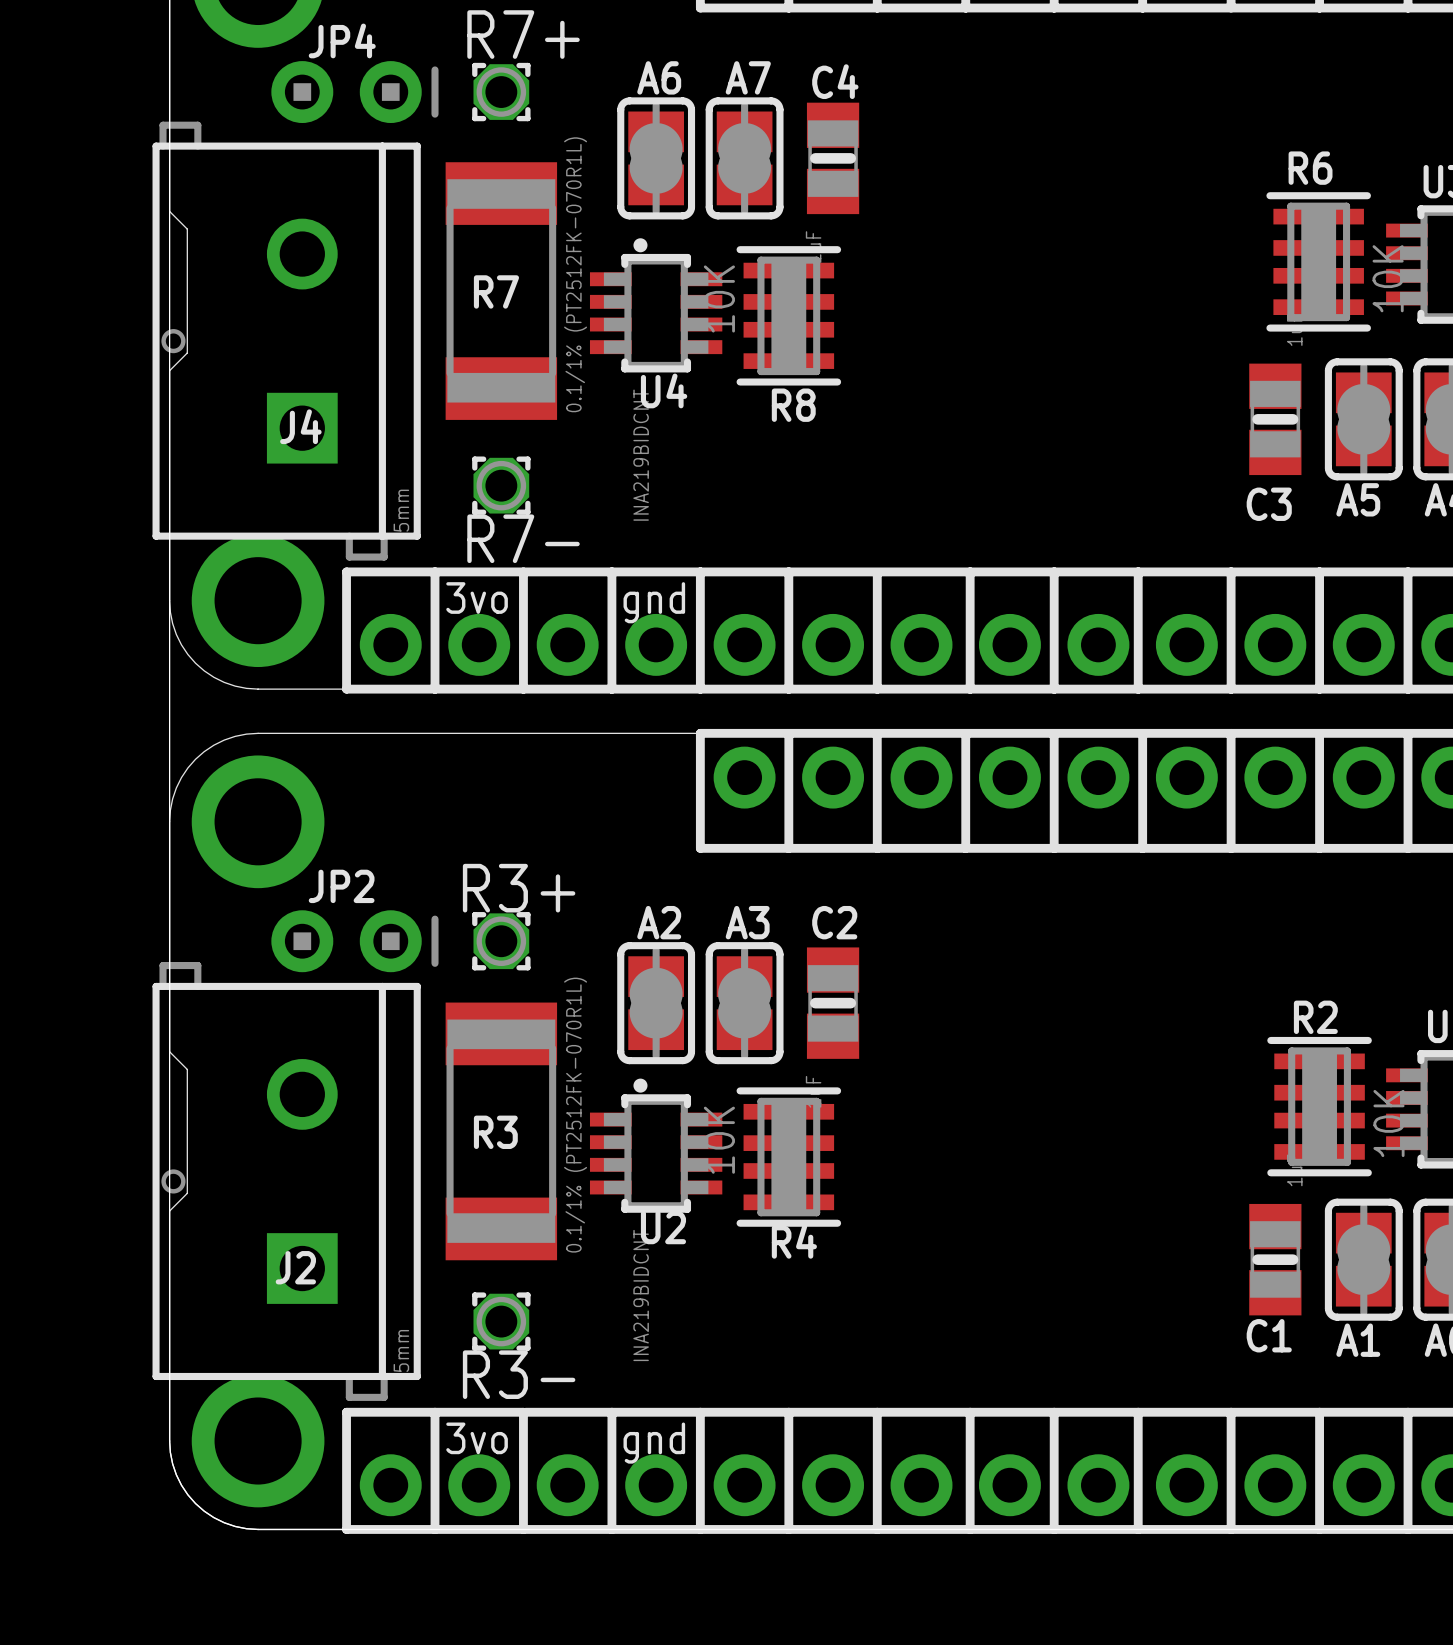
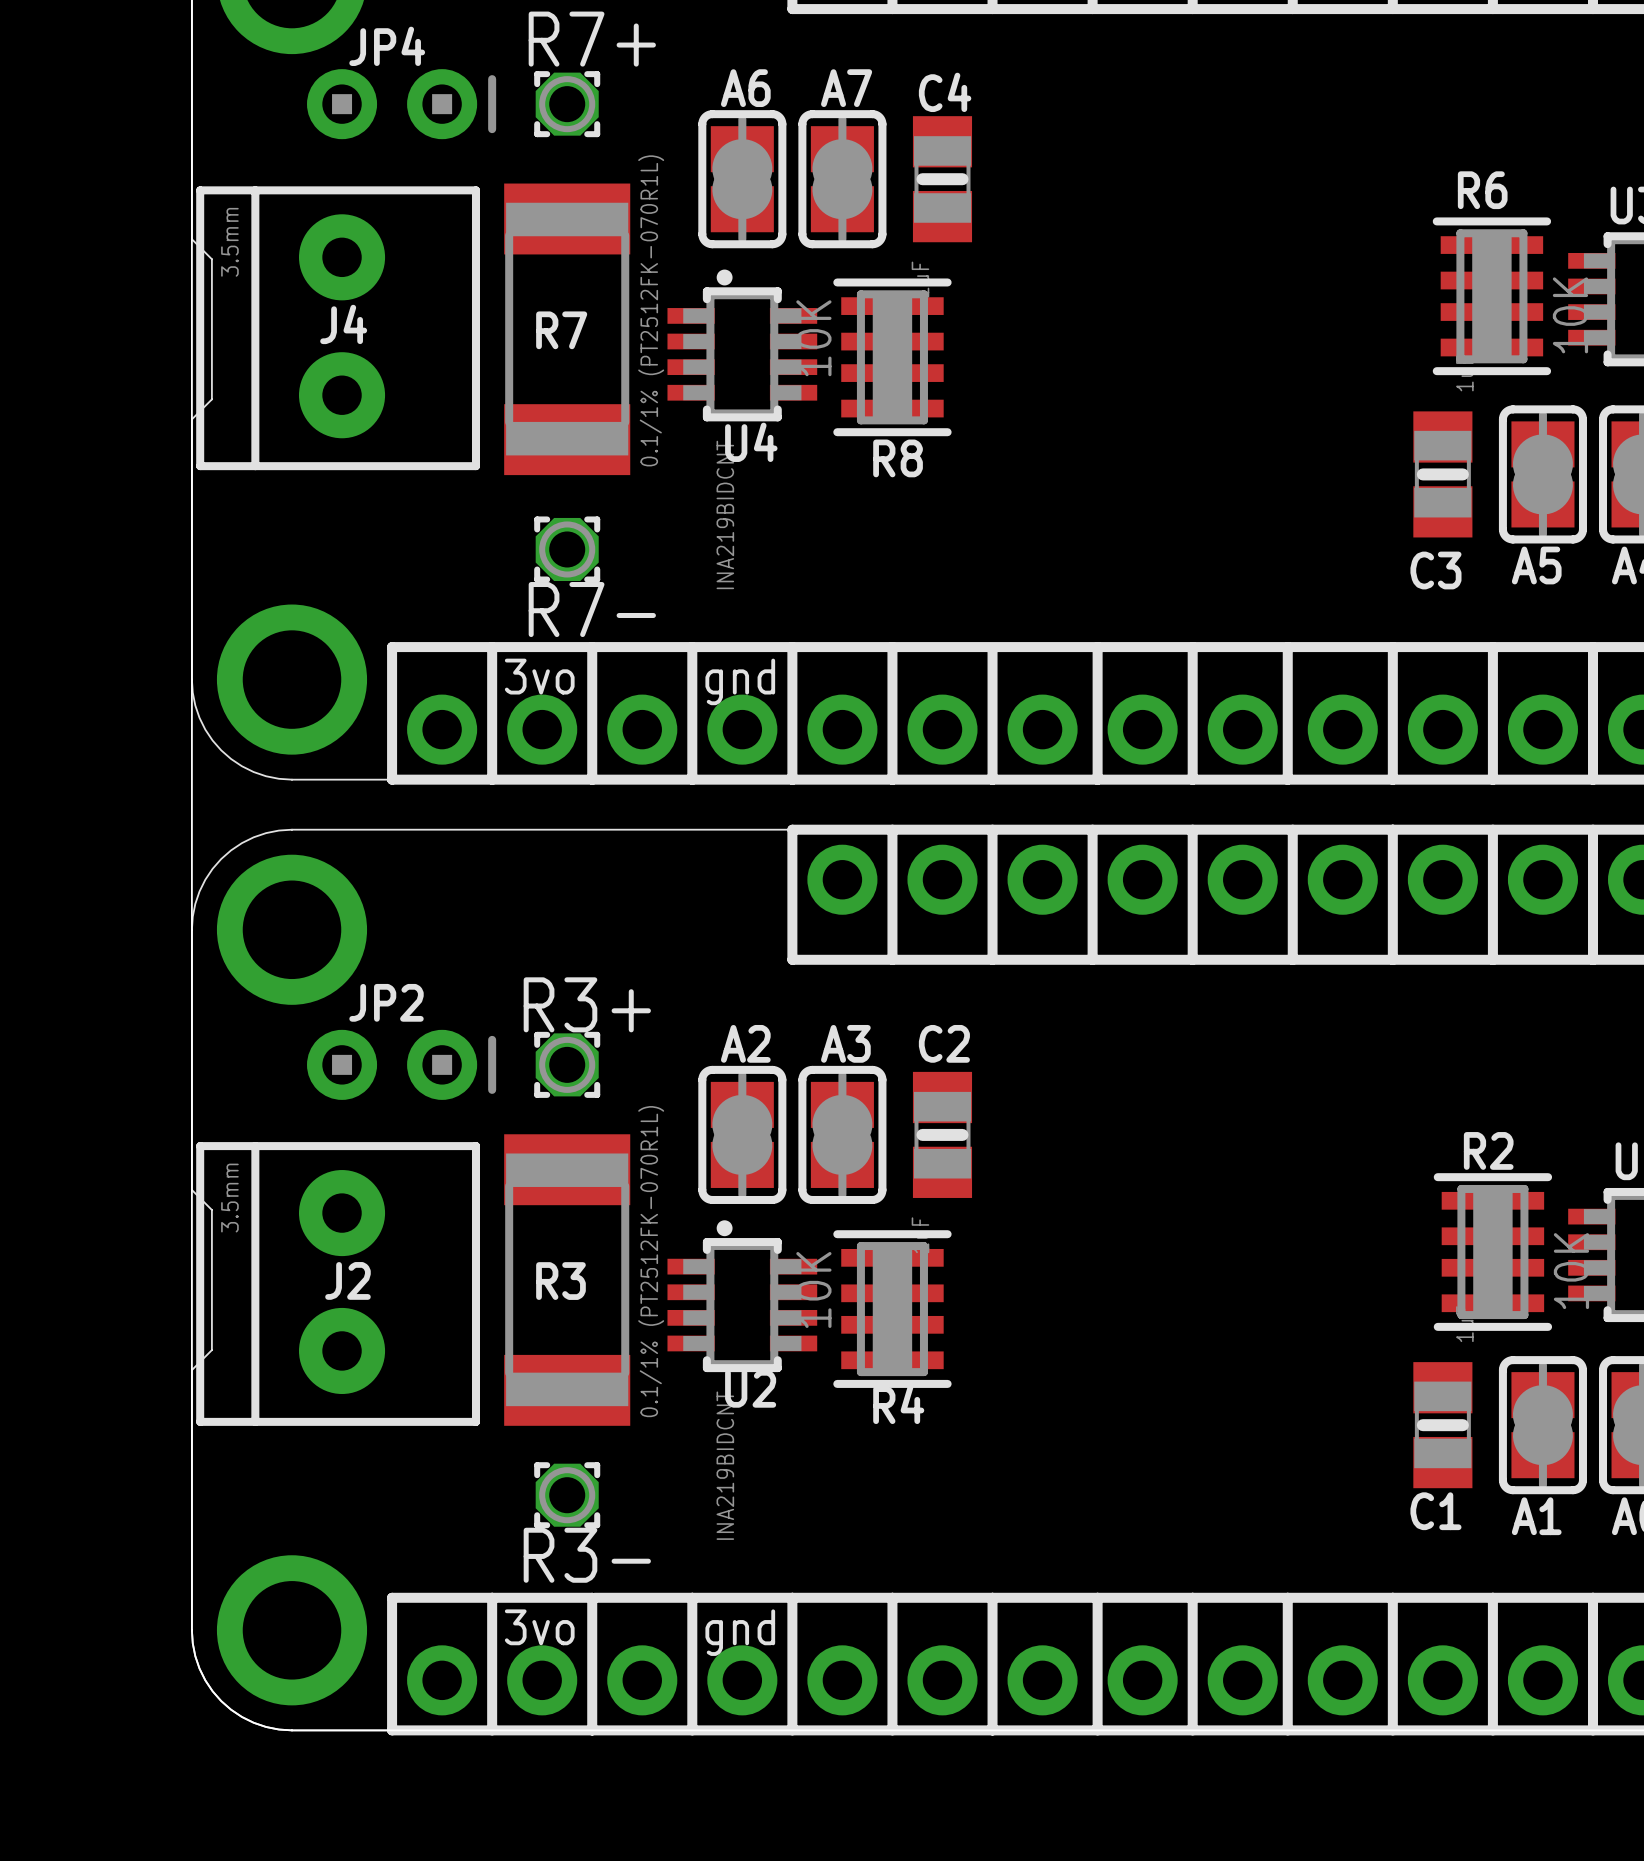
J4 footprint: [152, 121, 421, 561] -> [196, 186, 480, 471]
J4 name position: J4 (300, 426) -> J4 (343, 324)
J4 value: 5mm (401, 510) -> 3.5mm (229, 242)
J2 footprint: [152, 962, 421, 1401] -> [196, 1142, 480, 1426]
J2 name position: J2 (295, 1267) -> J2 (347, 1280)
J2 value: 5mm (401, 1350) -> 3.5mm (229, 1198)

